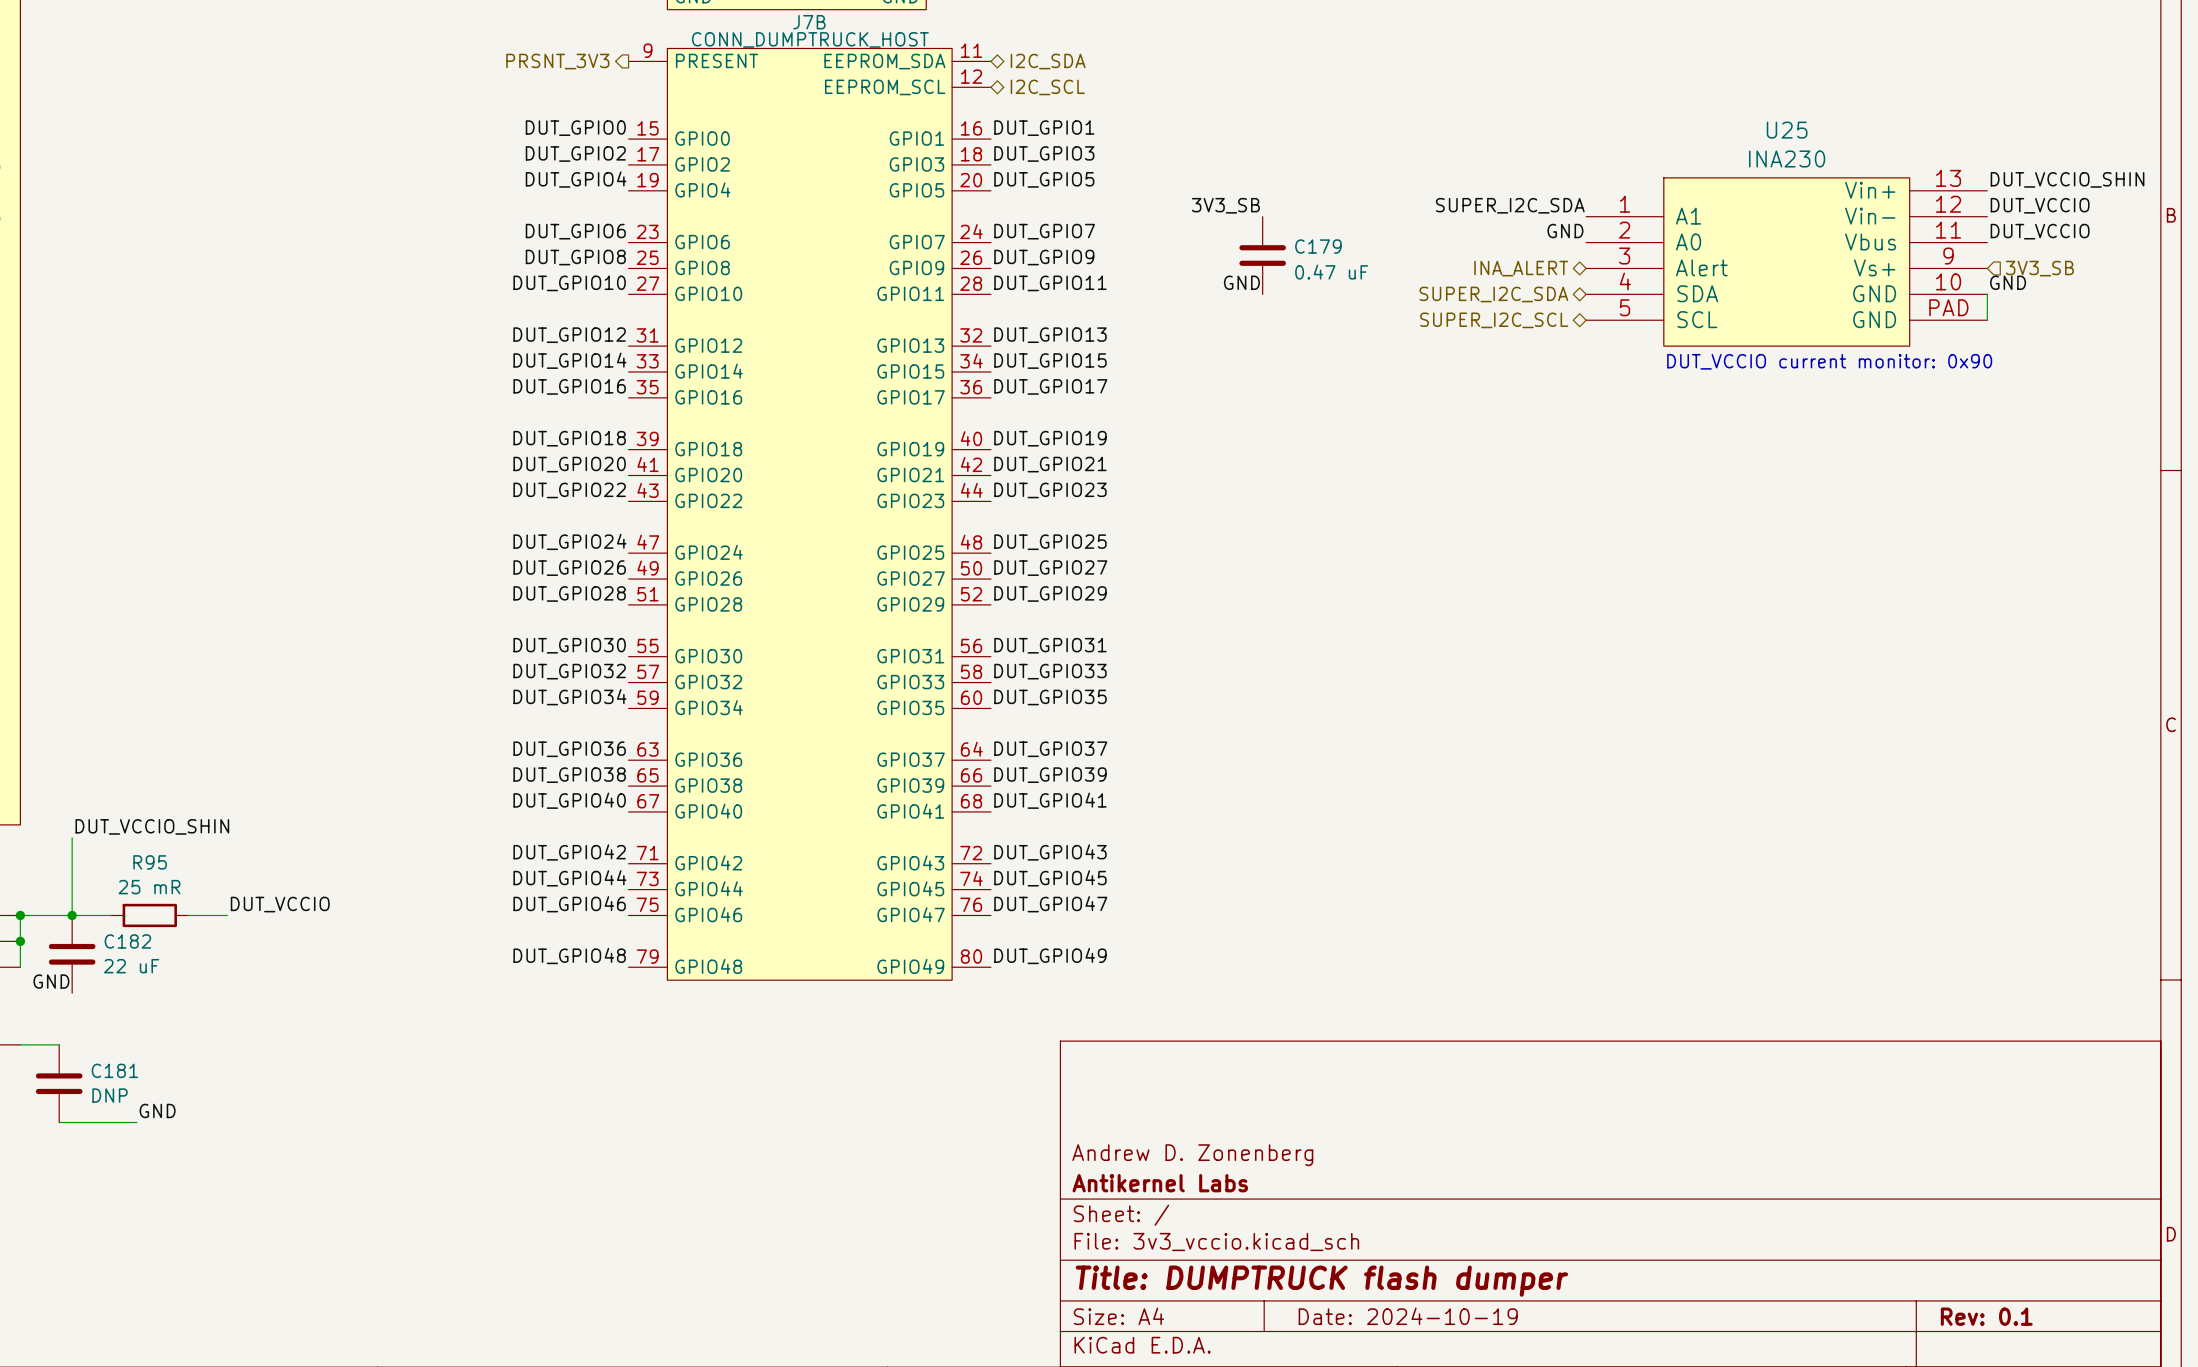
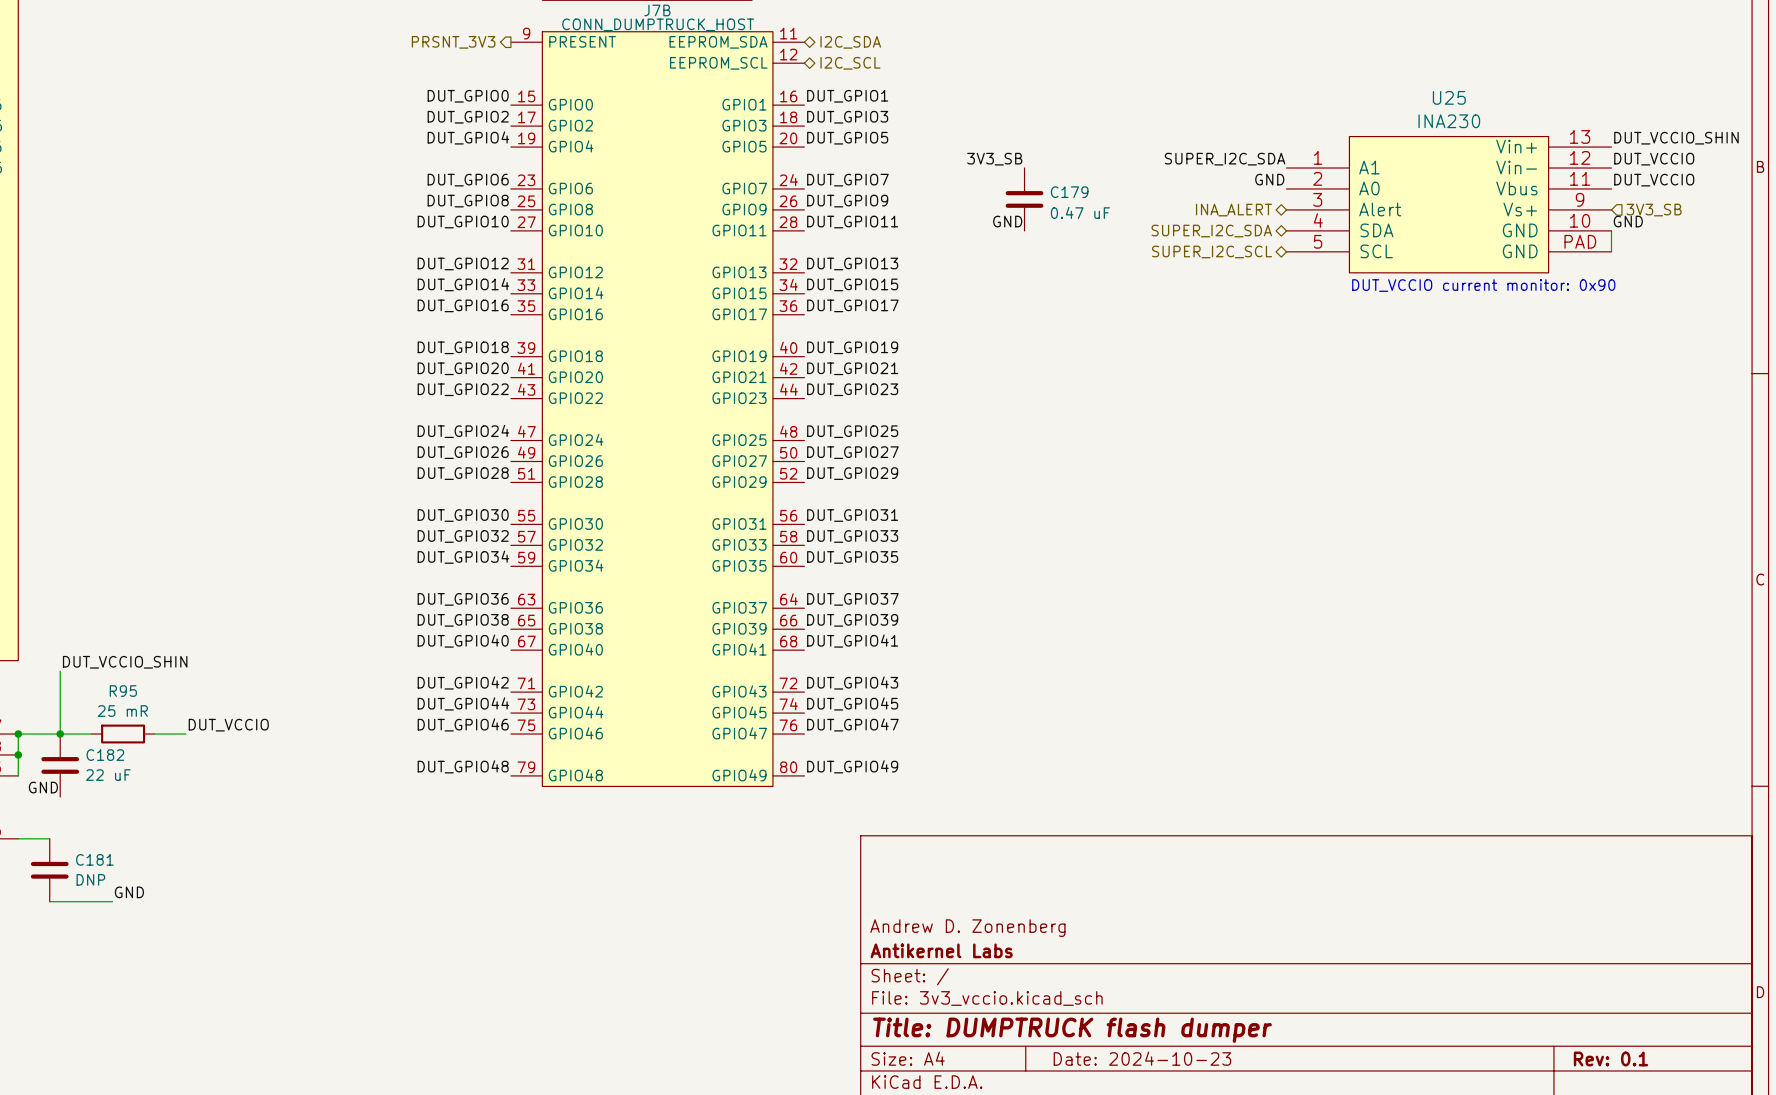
title block: Date: 2024-10-19 (1408, 1316) -> Date: 2024-10-23 (1142, 1058)

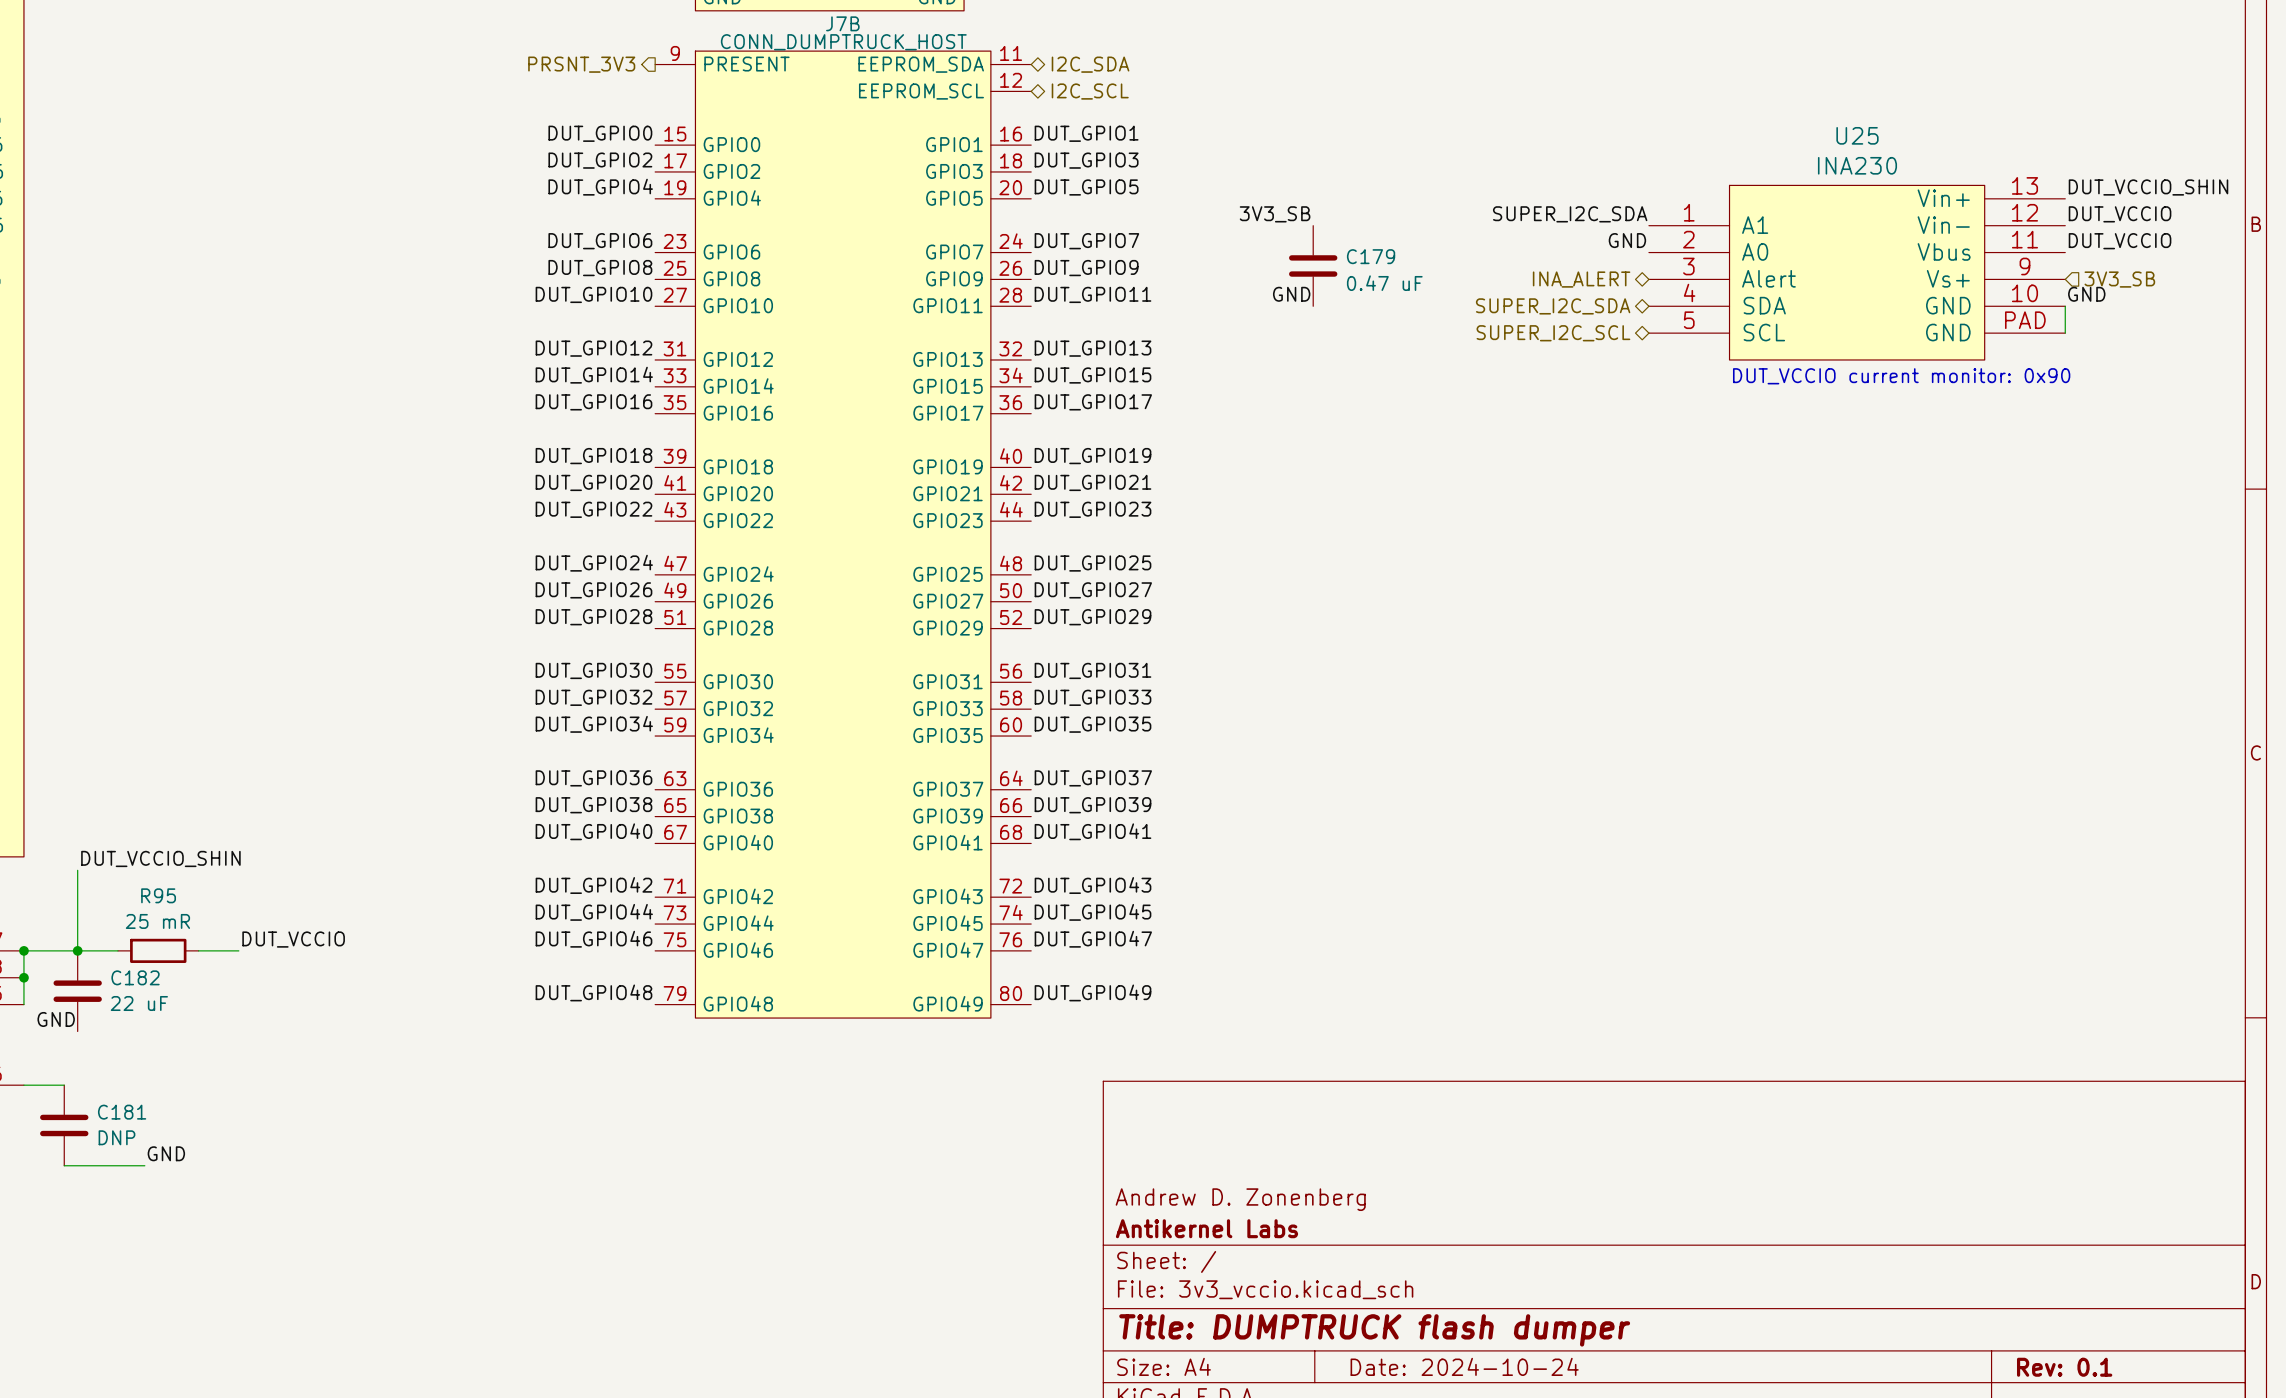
title block: Date: 2024-10-23 (1142, 1058) -> Date: 2024-10-24 (1464, 1366)

